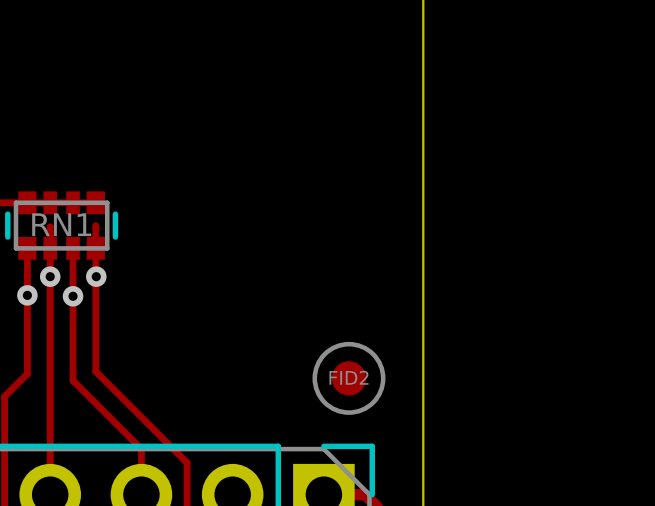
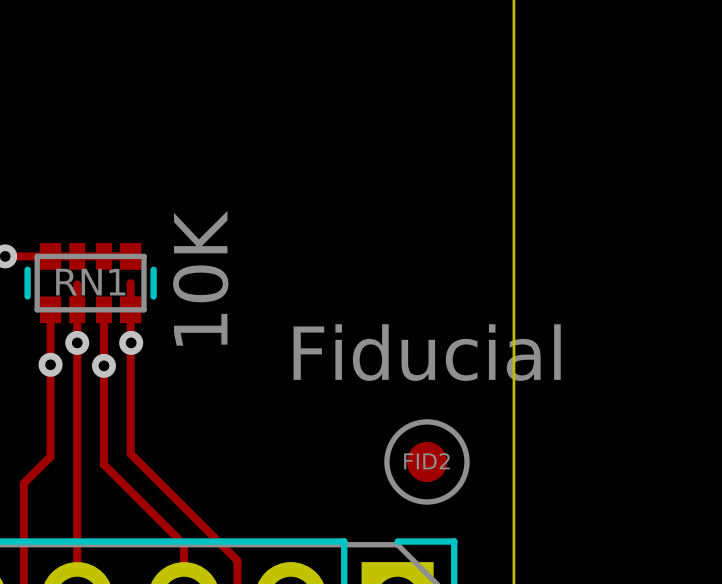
RN1 value: none -> 10K (200, 278)
FID2 value: none -> Fiducial (427, 352)

